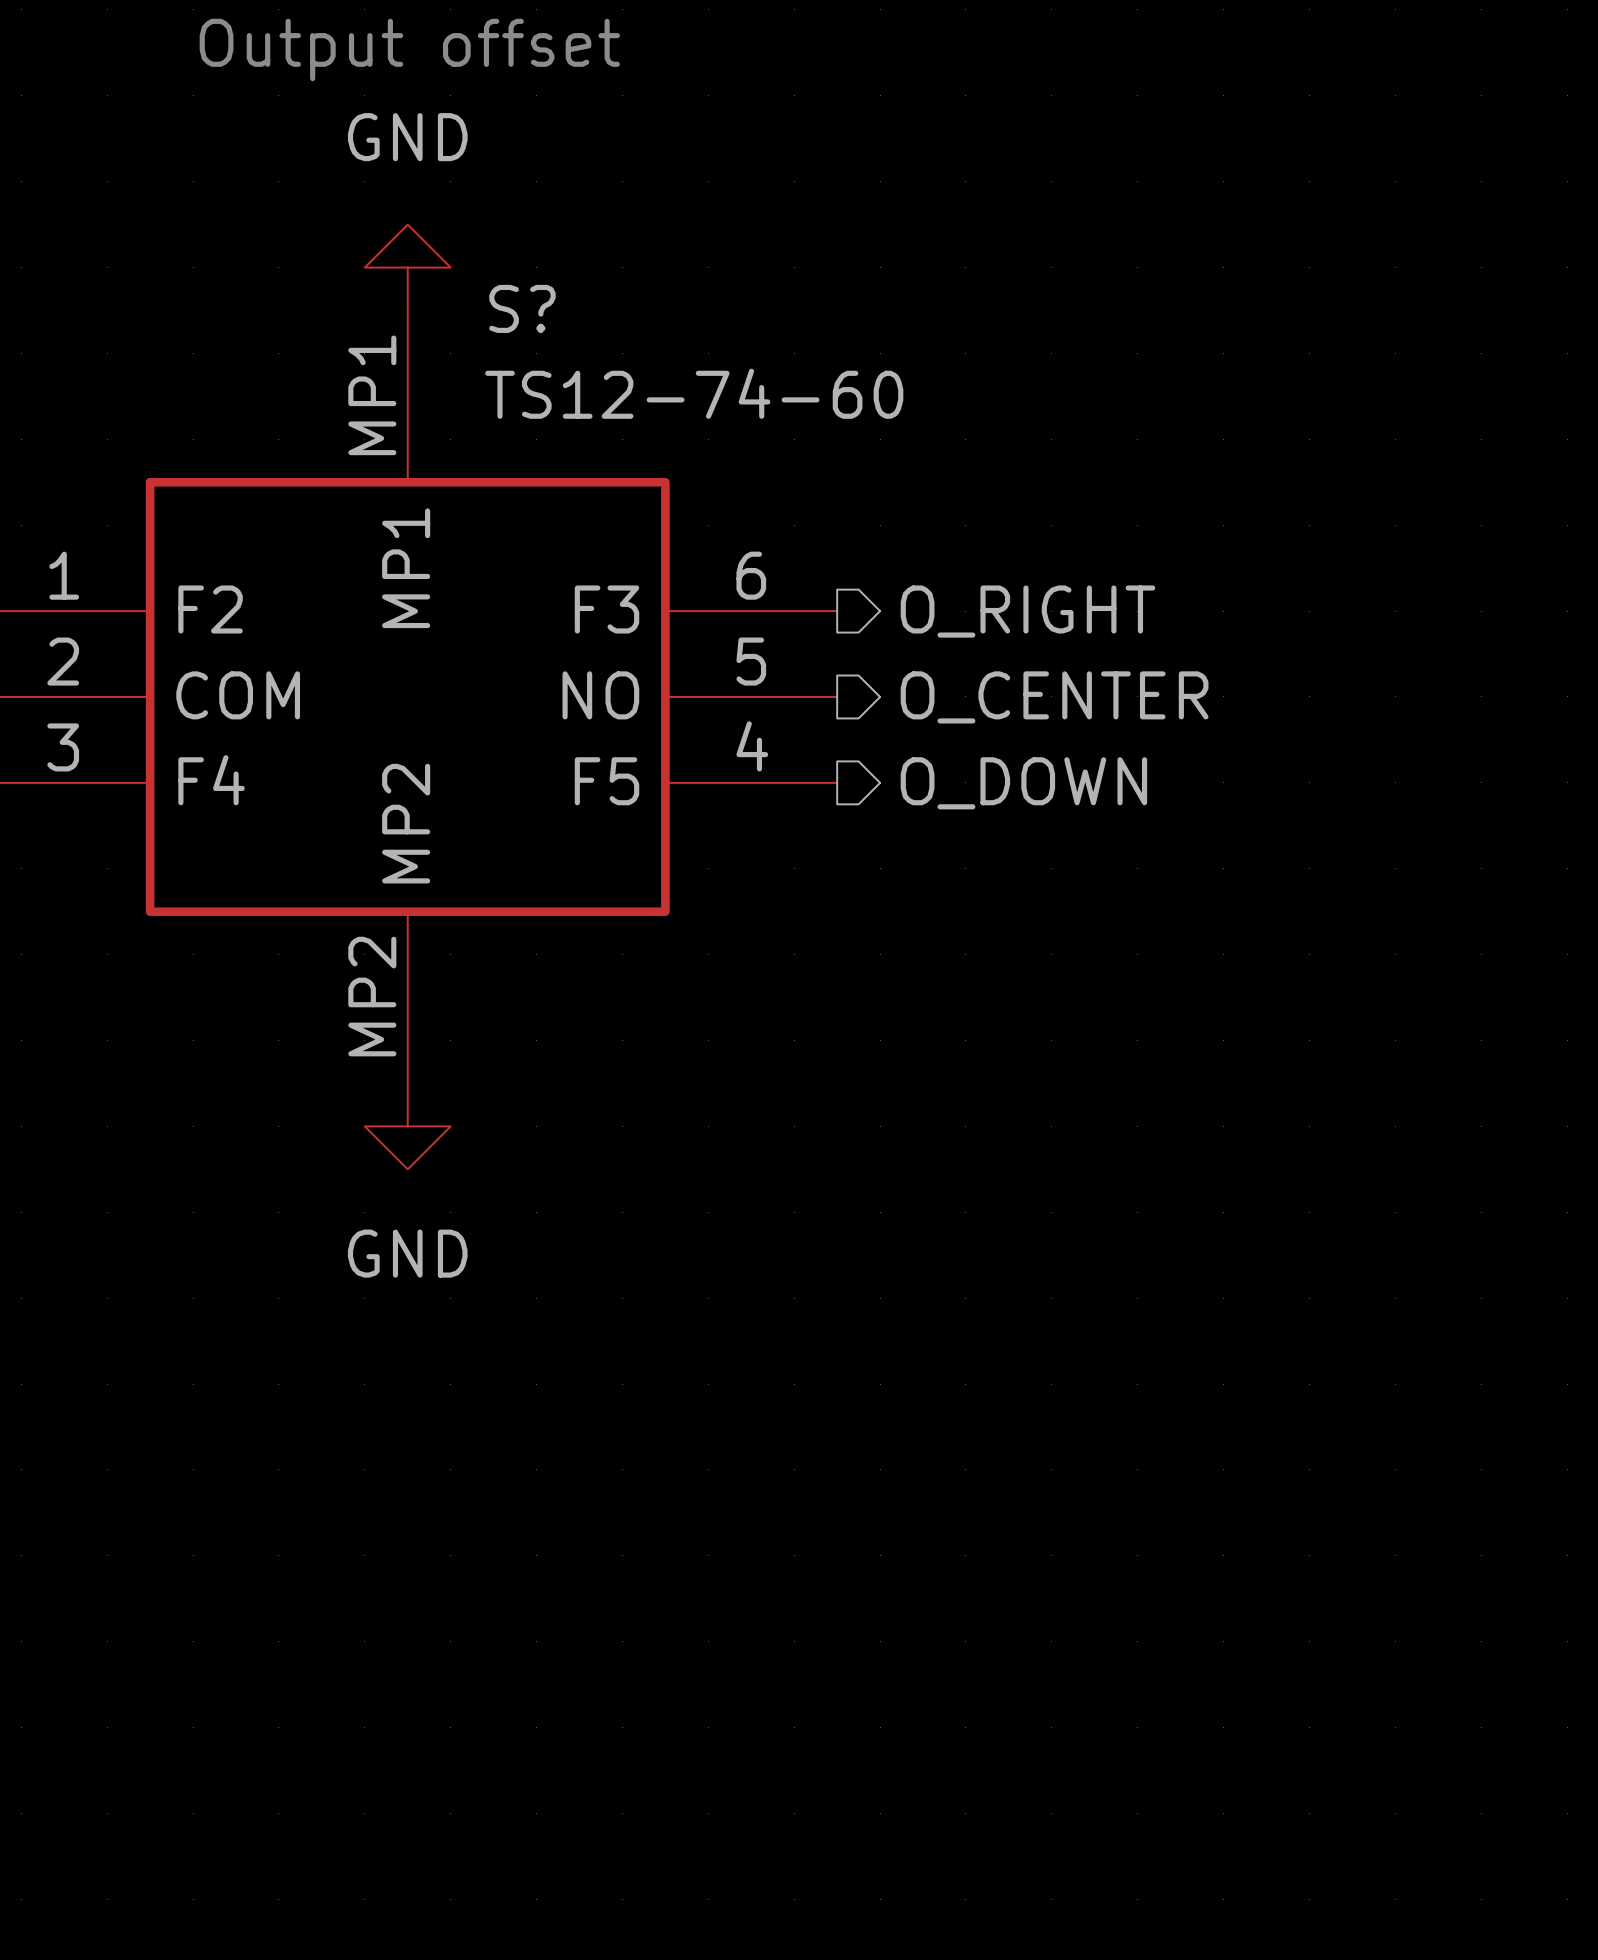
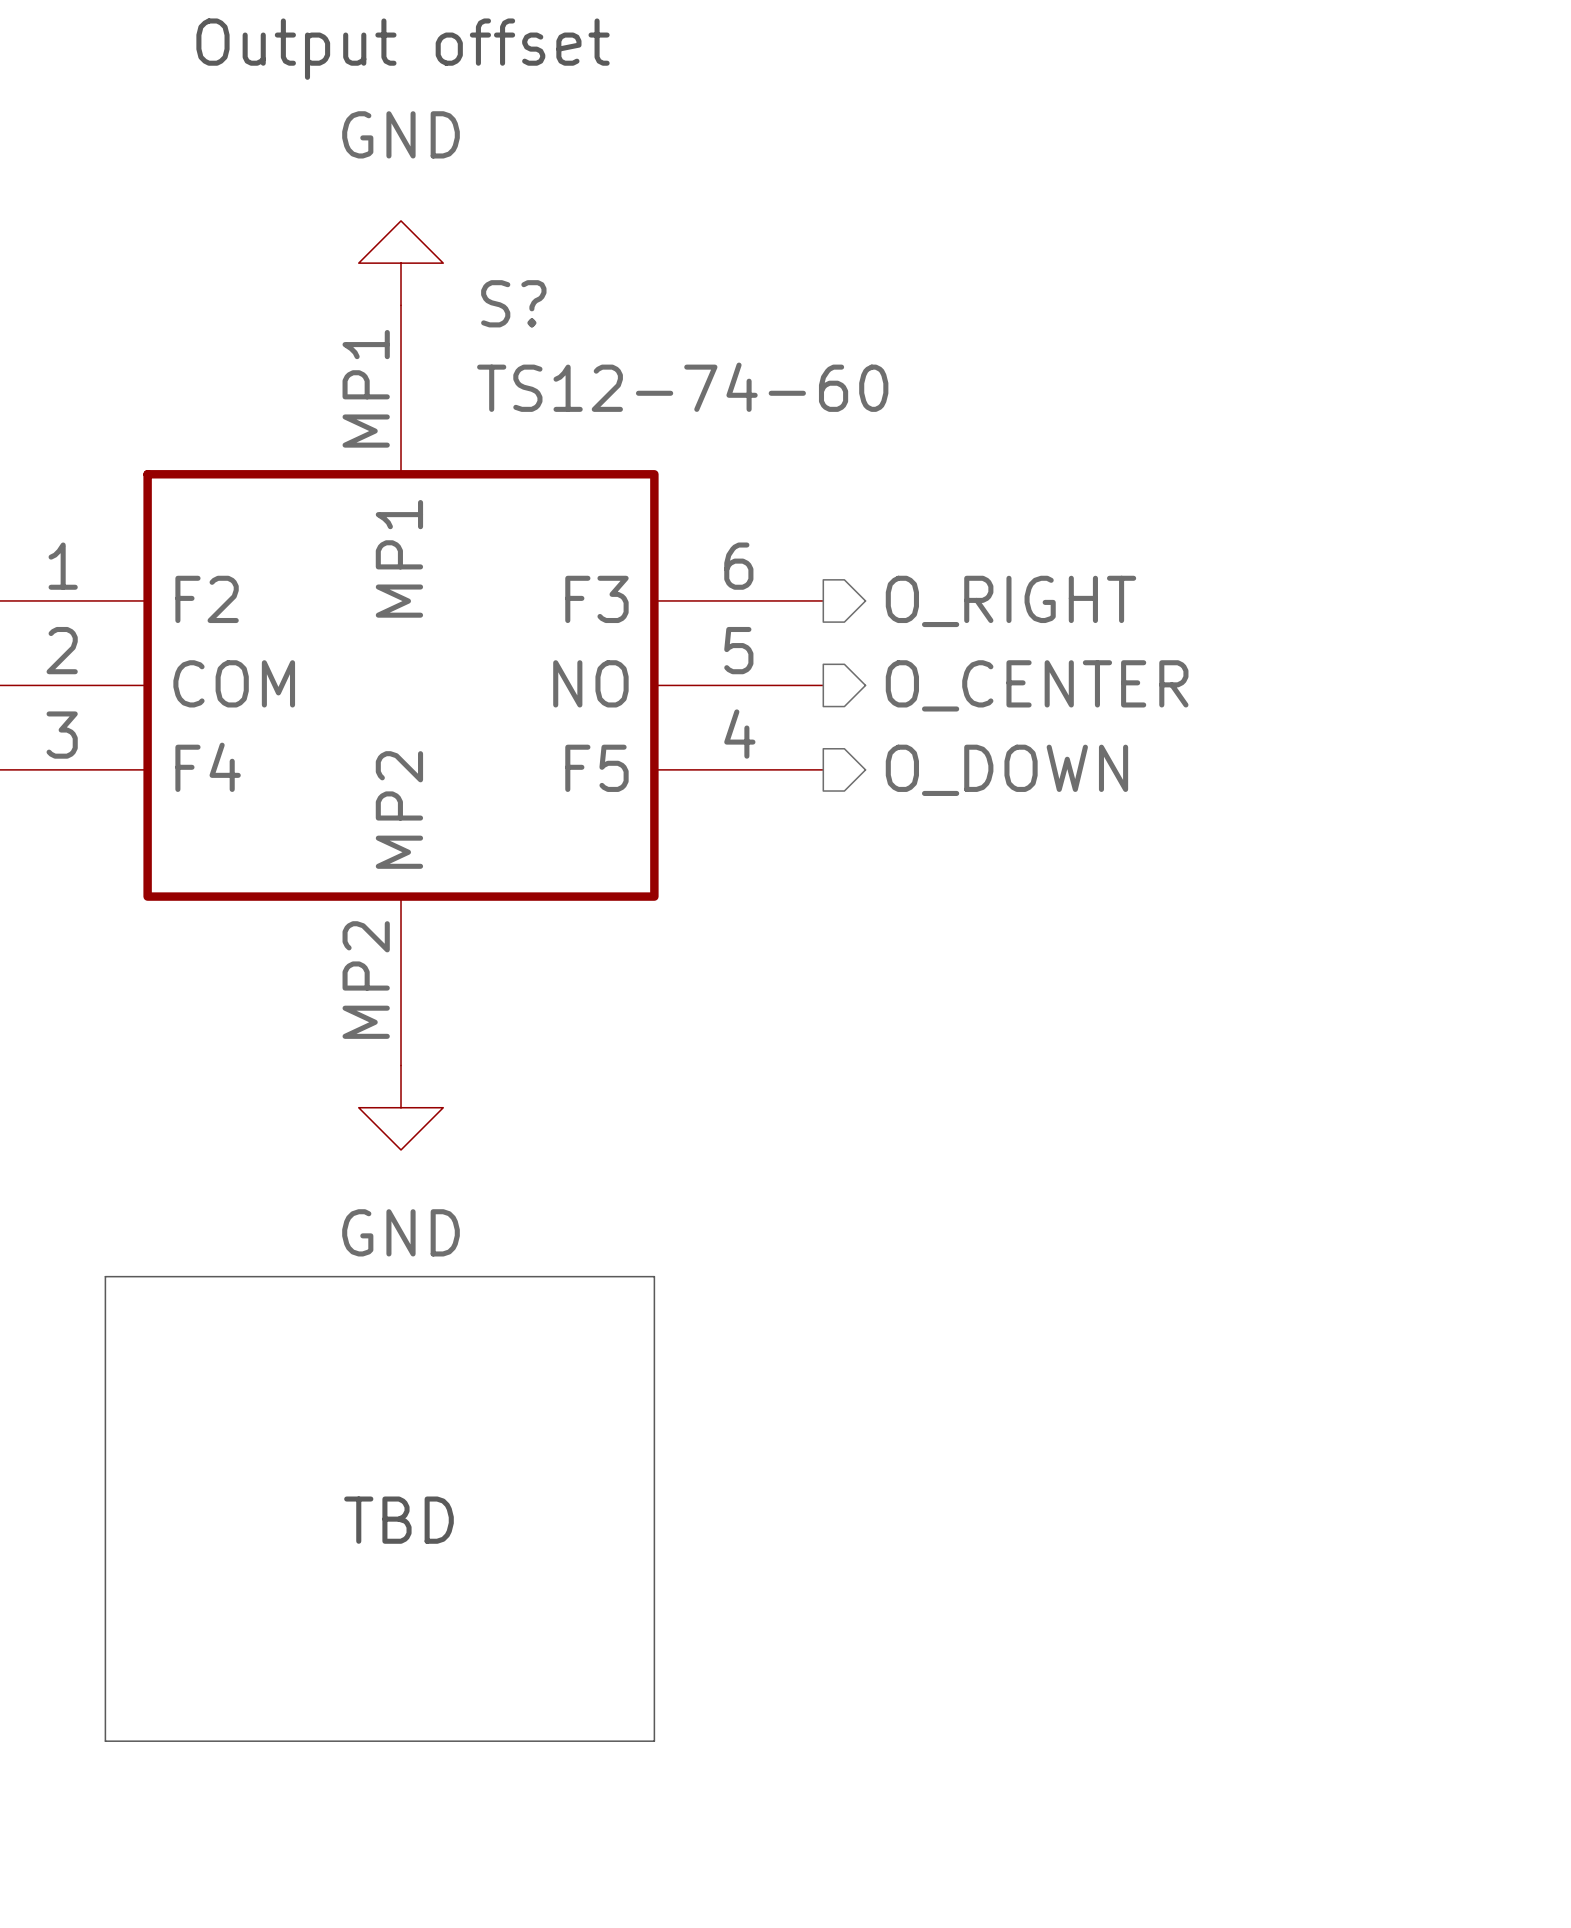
line: none -> (105, 1276) (654, 1276) (654, 1741) (105, 1741) (105, 1276)
text: none -> TBD (398, 1520)

